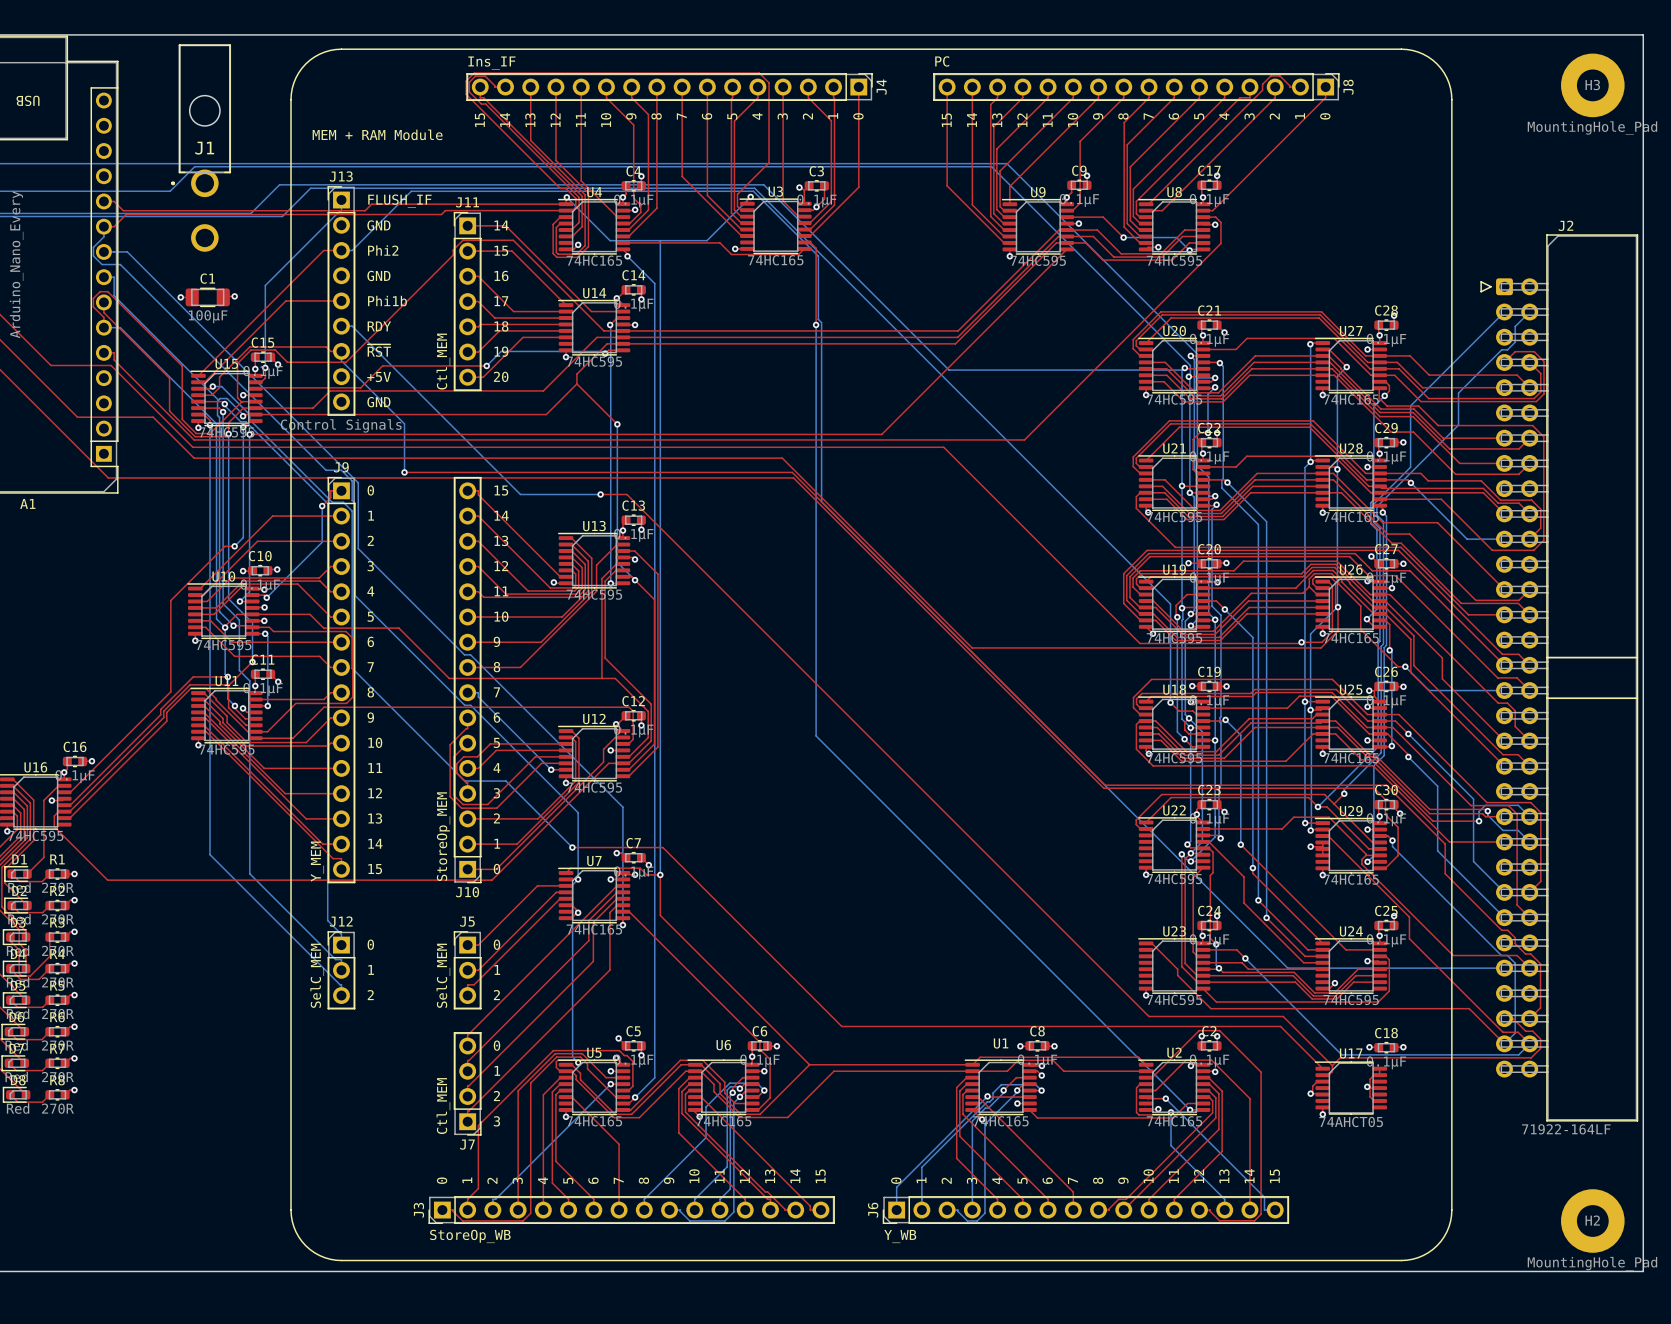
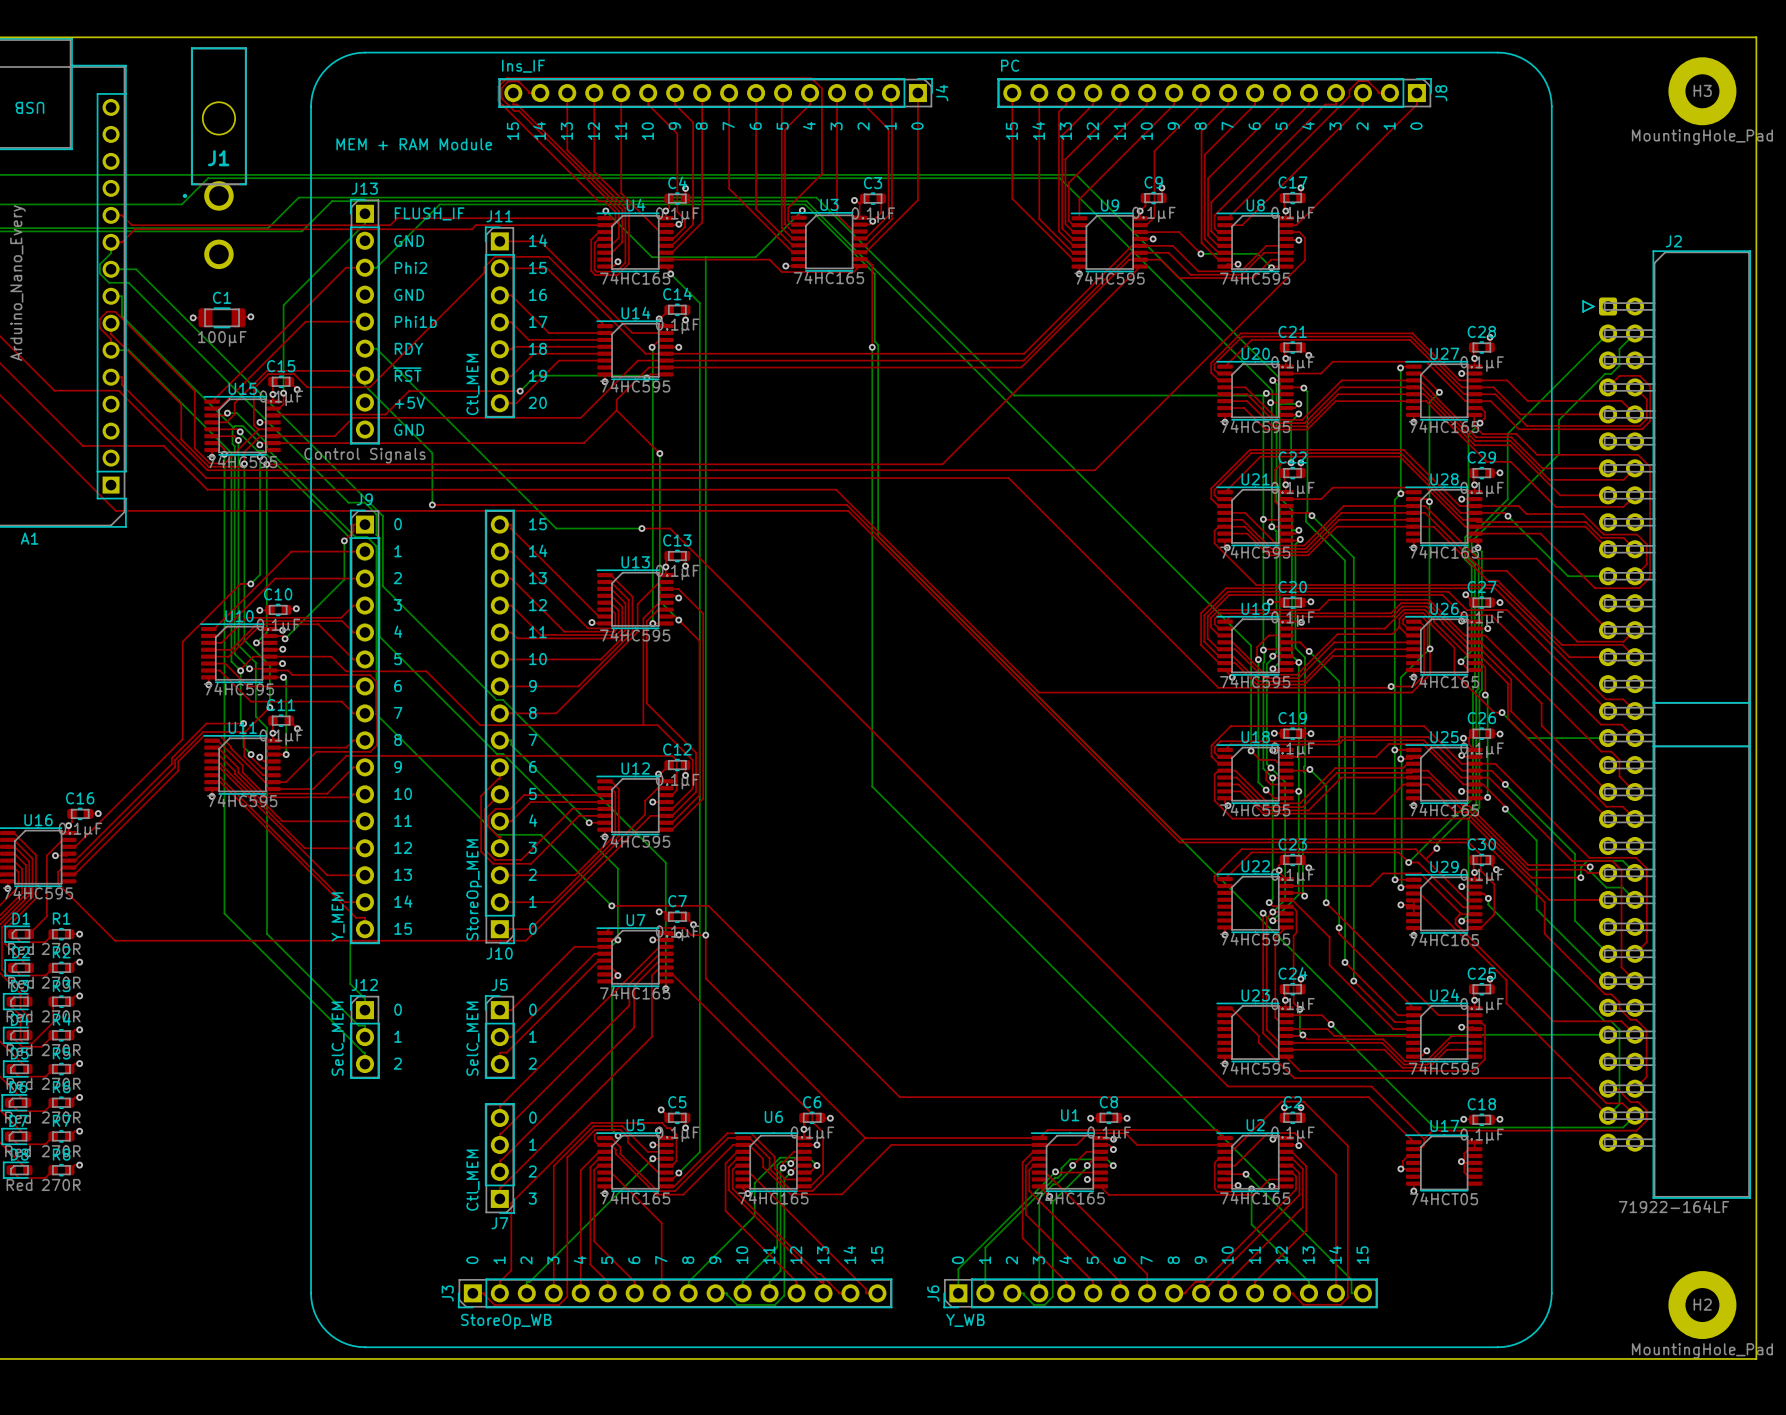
U17 value: 74AHCT05 (1351, 1121) -> 74HCT05 (1443, 1198)

